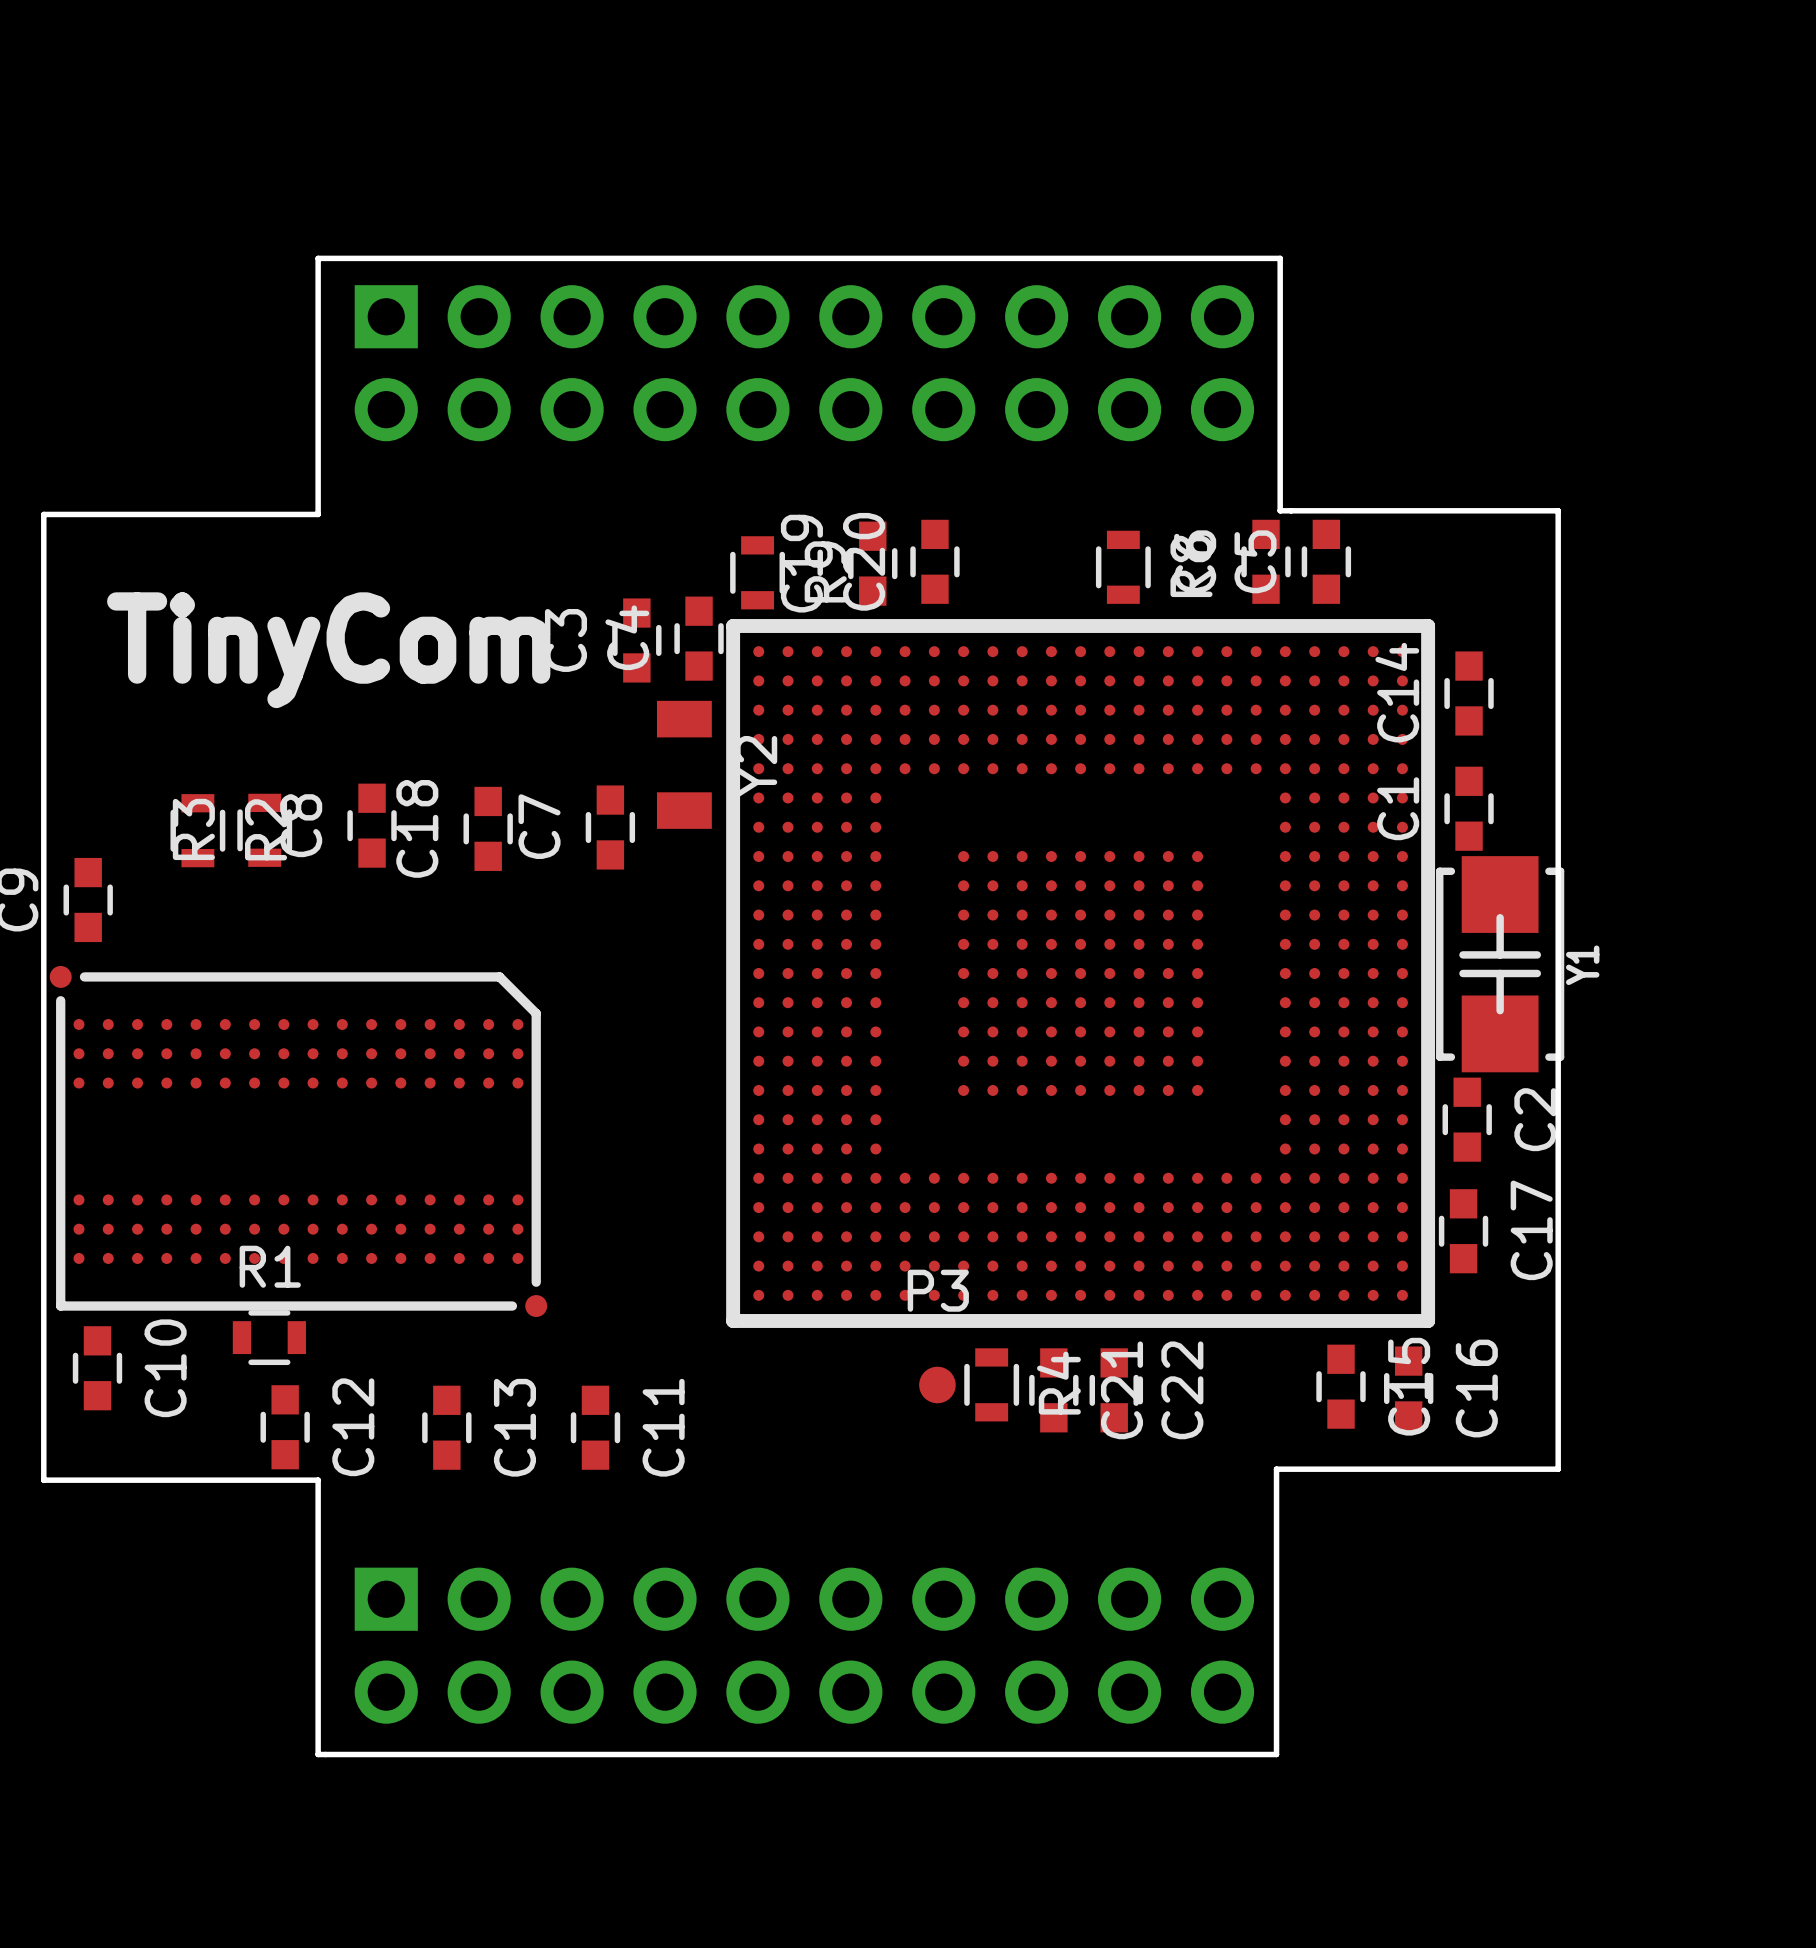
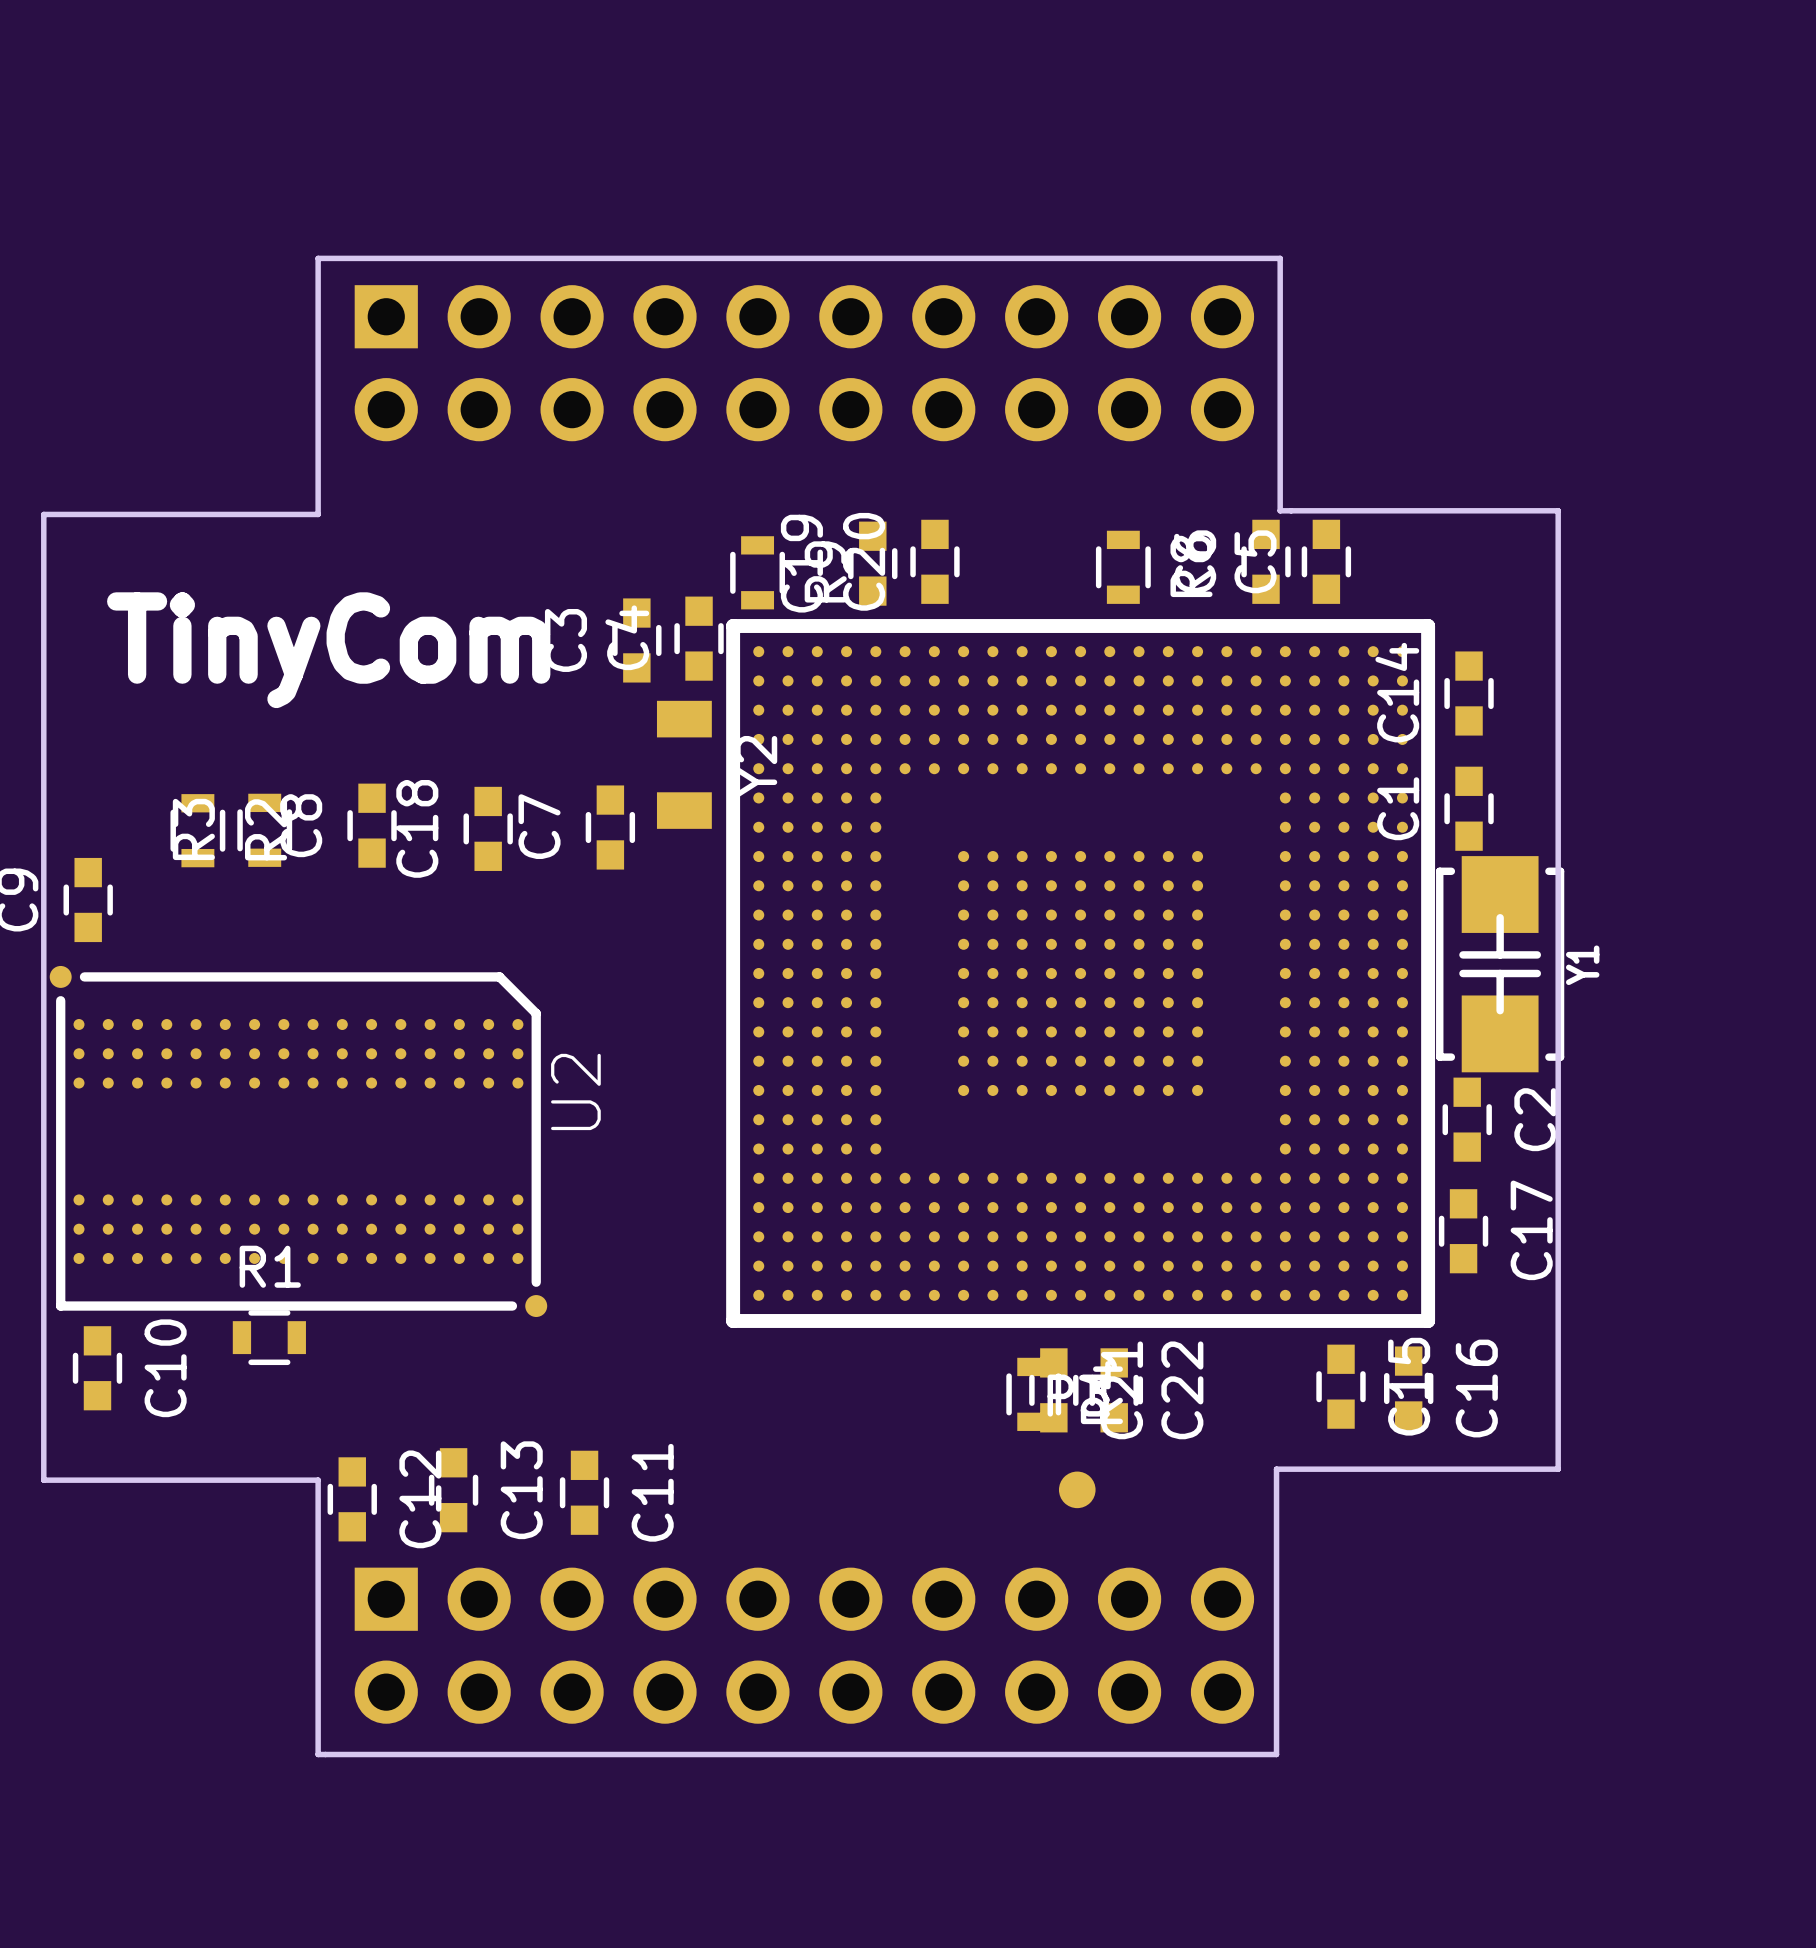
U2 name: none -> U2 (575, 1091)
P3 position: (937, 1384) -> (1077, 1489)
R4 position: (991, 1384) -> (1033, 1394)
C12 position: (285, 1427) -> (352, 1499)
C13 position: (446, 1427) -> (453, 1490)
C11 position: (595, 1427) -> (584, 1492)

